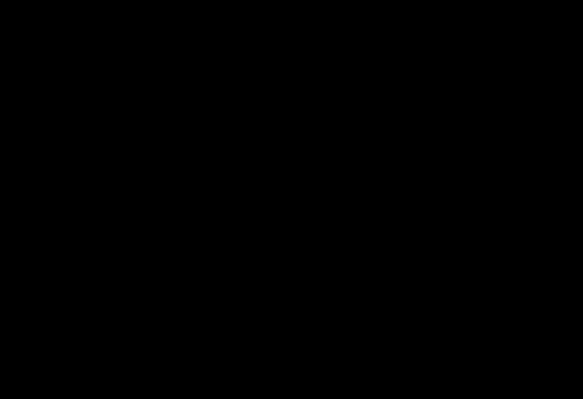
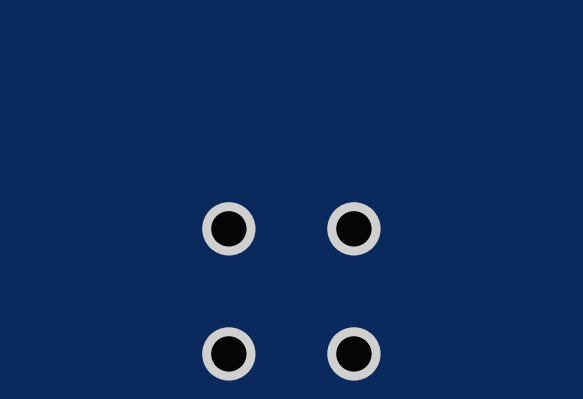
part: none -> (291, 291)

